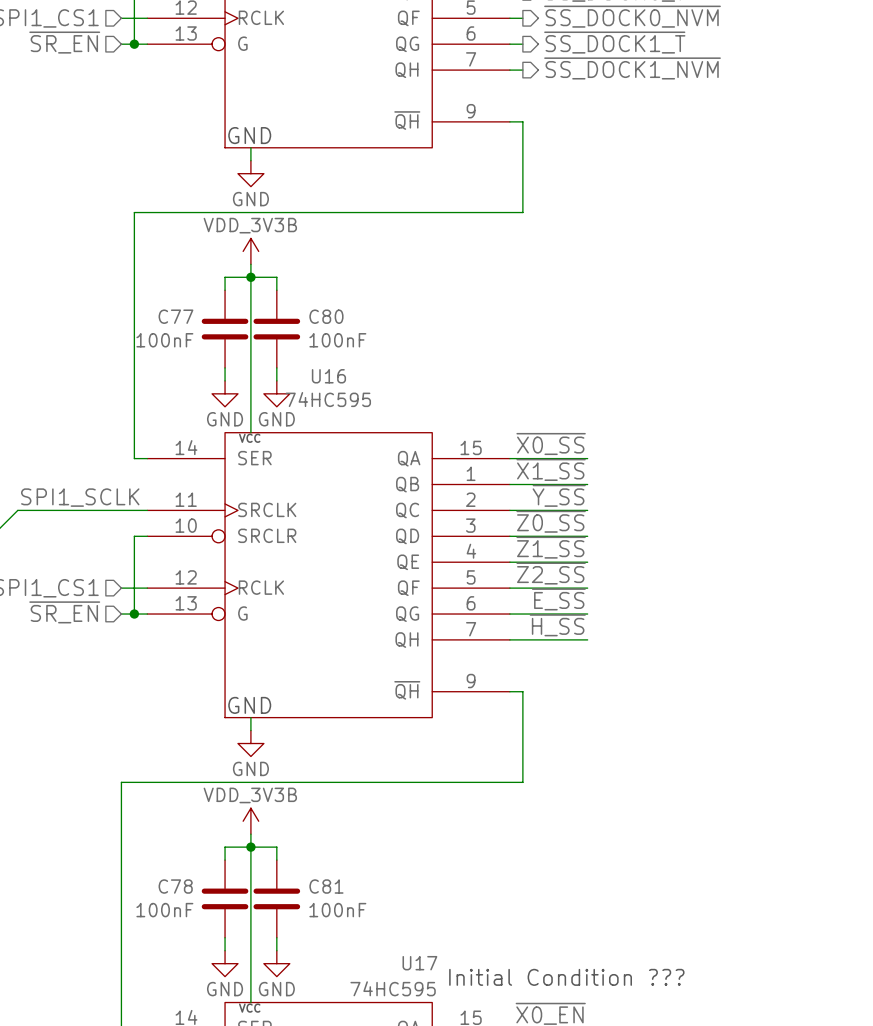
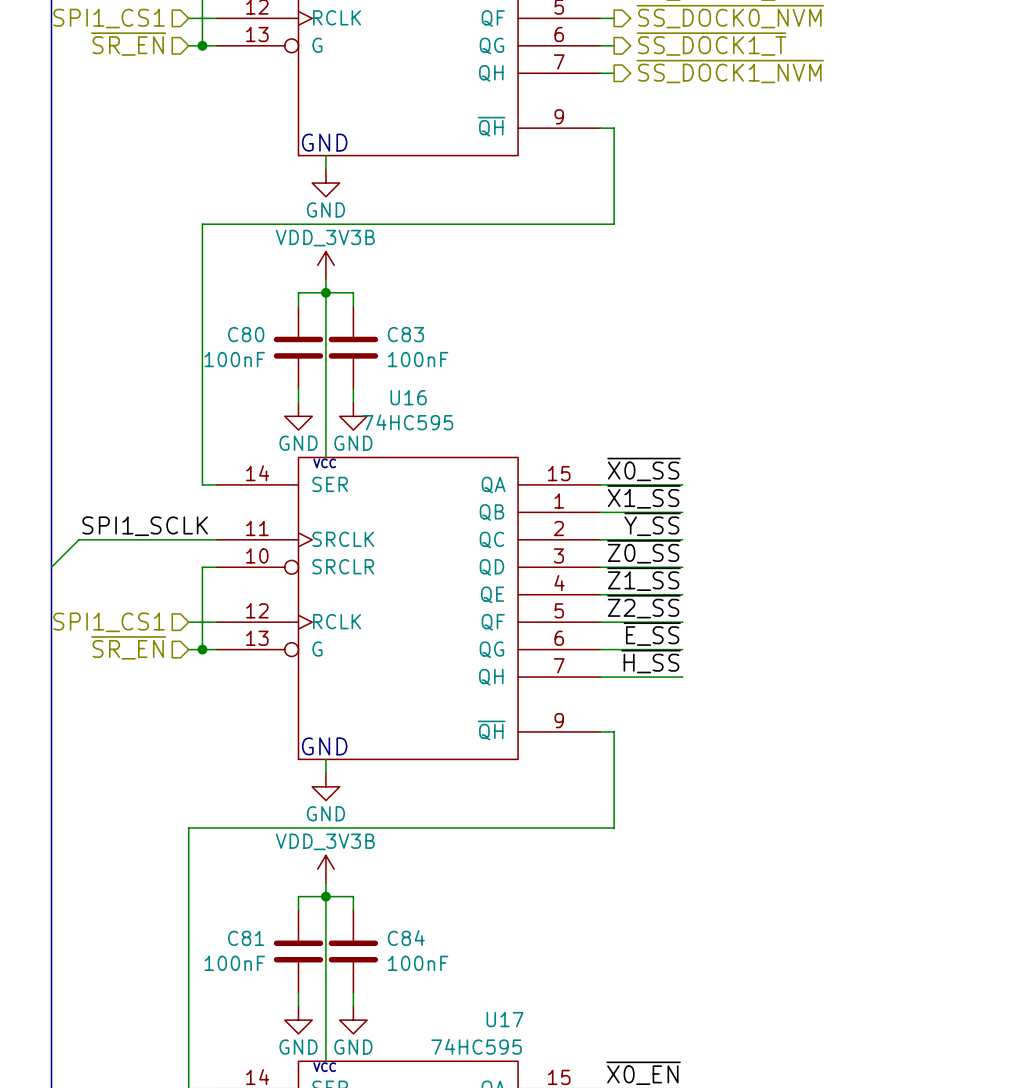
C77 name: C77 (175, 316) -> C80 (246, 334)
C80 name: C80 (326, 316) -> C83 (405, 334)
C78 name: C78 (175, 886) -> C81 (246, 938)
C81 name: C81 (326, 886) -> C84 (406, 938)
text: Initial Condition ??? (566, 977) -> none

